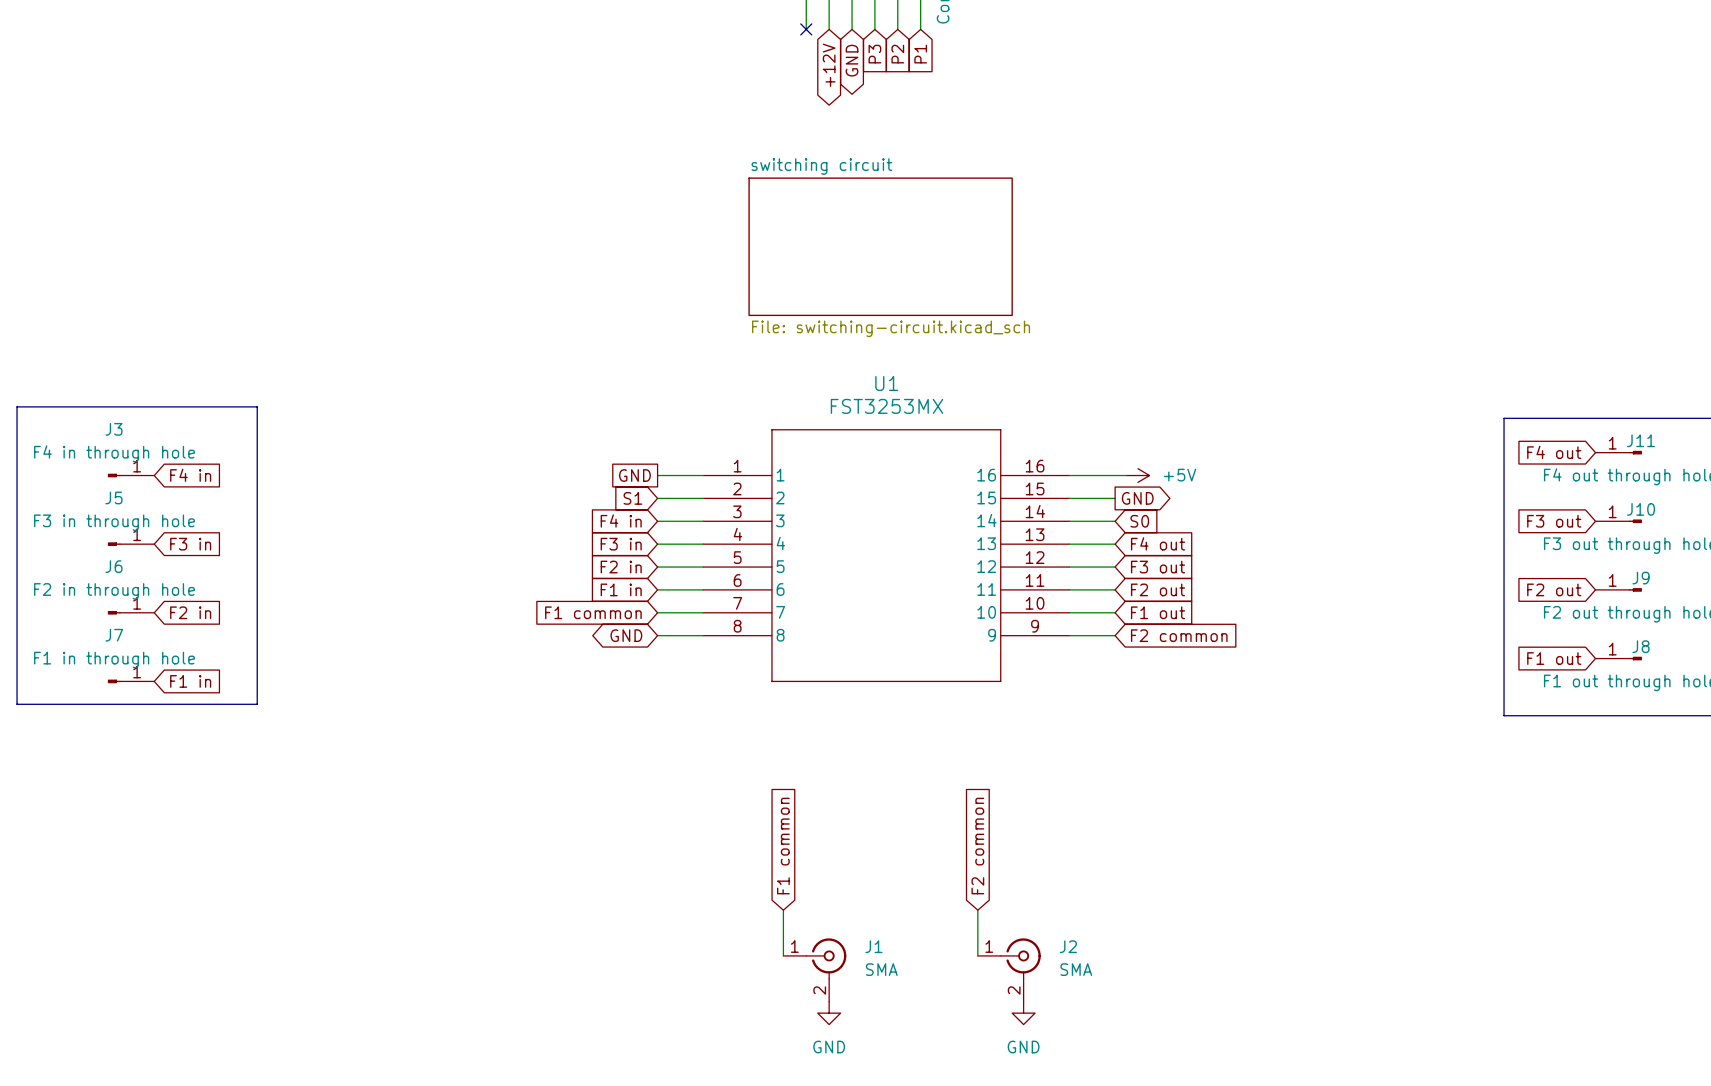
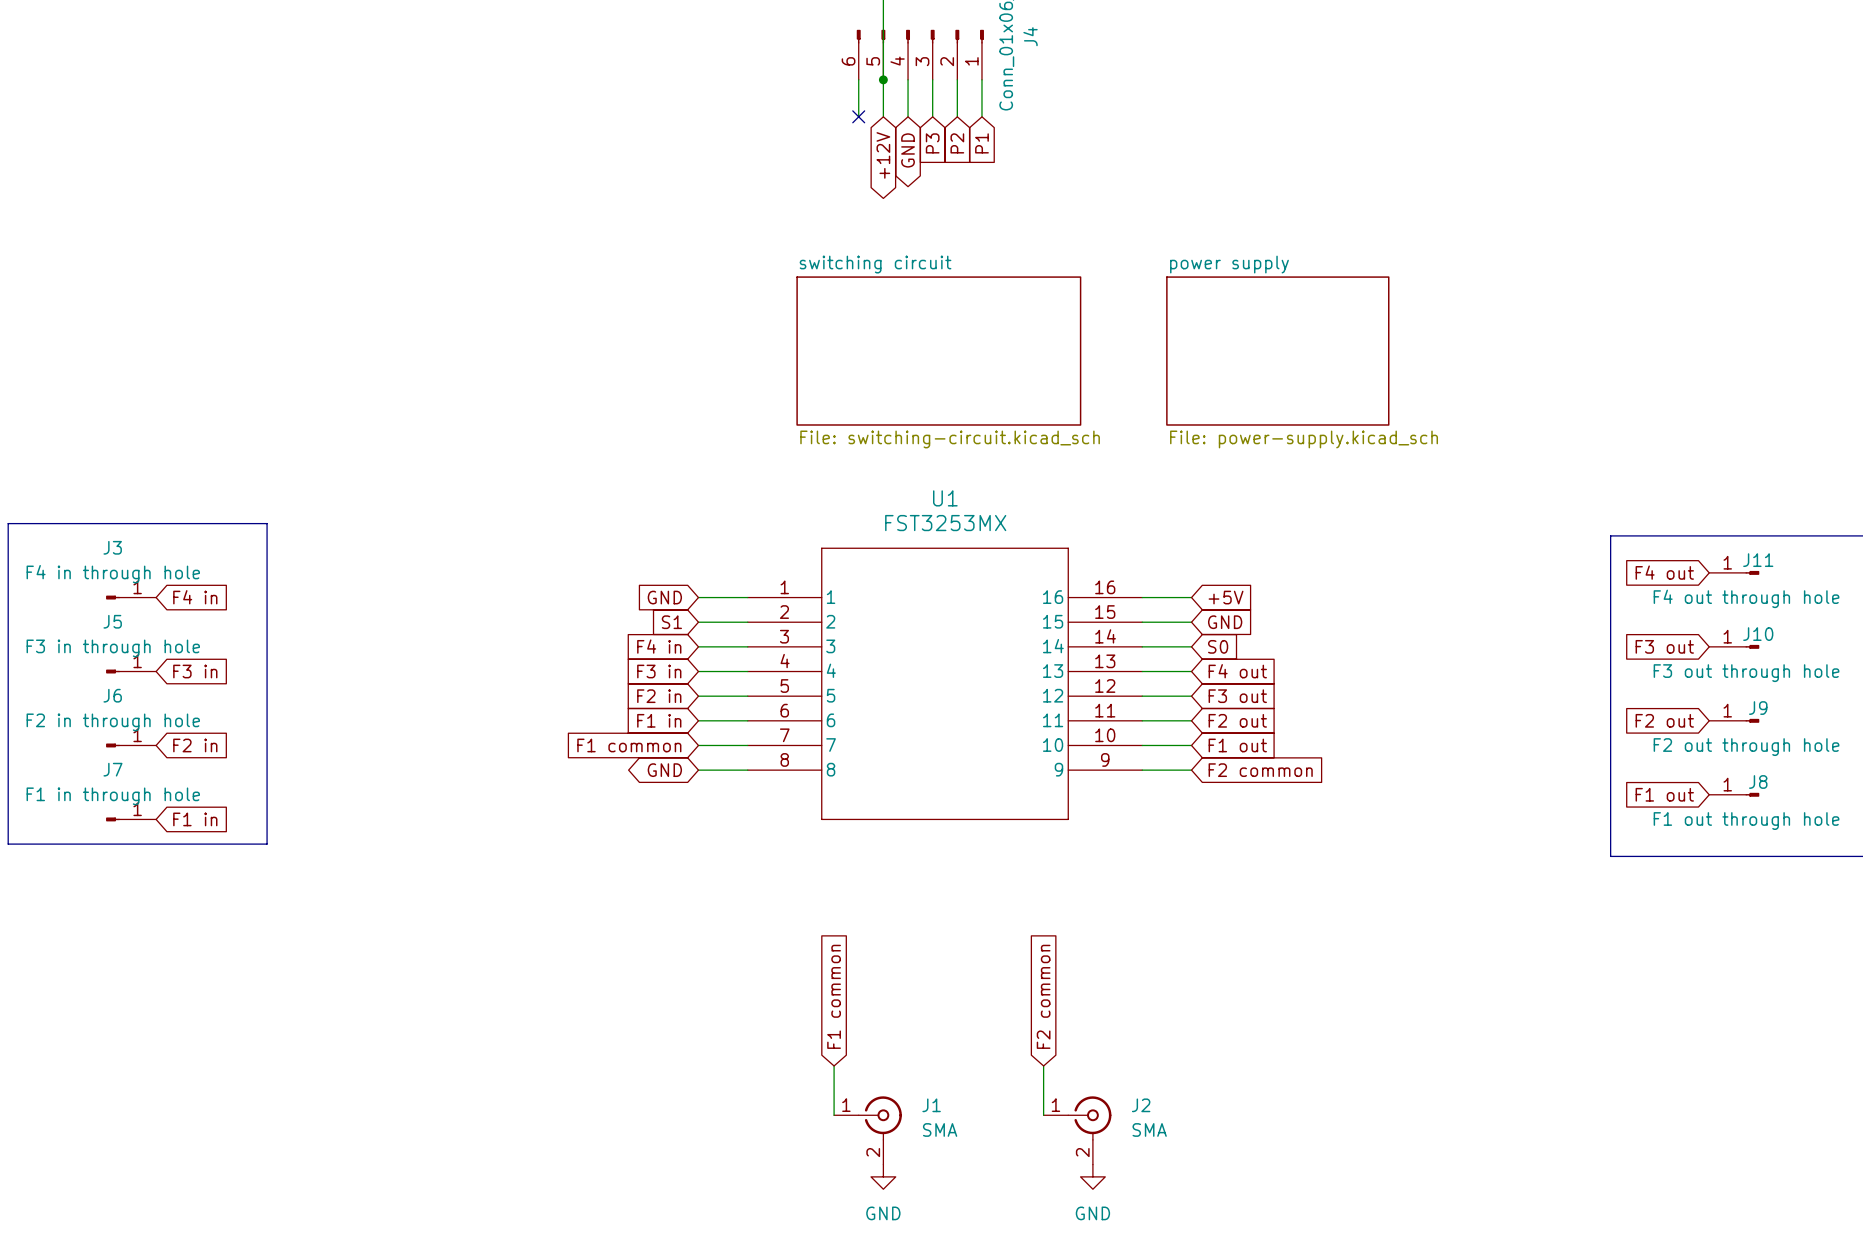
sheet power supply: none -> File: power-supply.kicad_sch (1277, 351)
global label shape: passive (634, 475) -> input (664, 597)
wire: (1115, 475) (1126, 475) -> none
power symbol: +5V (1137, 475) -> none
global label: none -> +5V (1226, 597)
global label shape: output (1137, 498) -> input (1225, 622)

